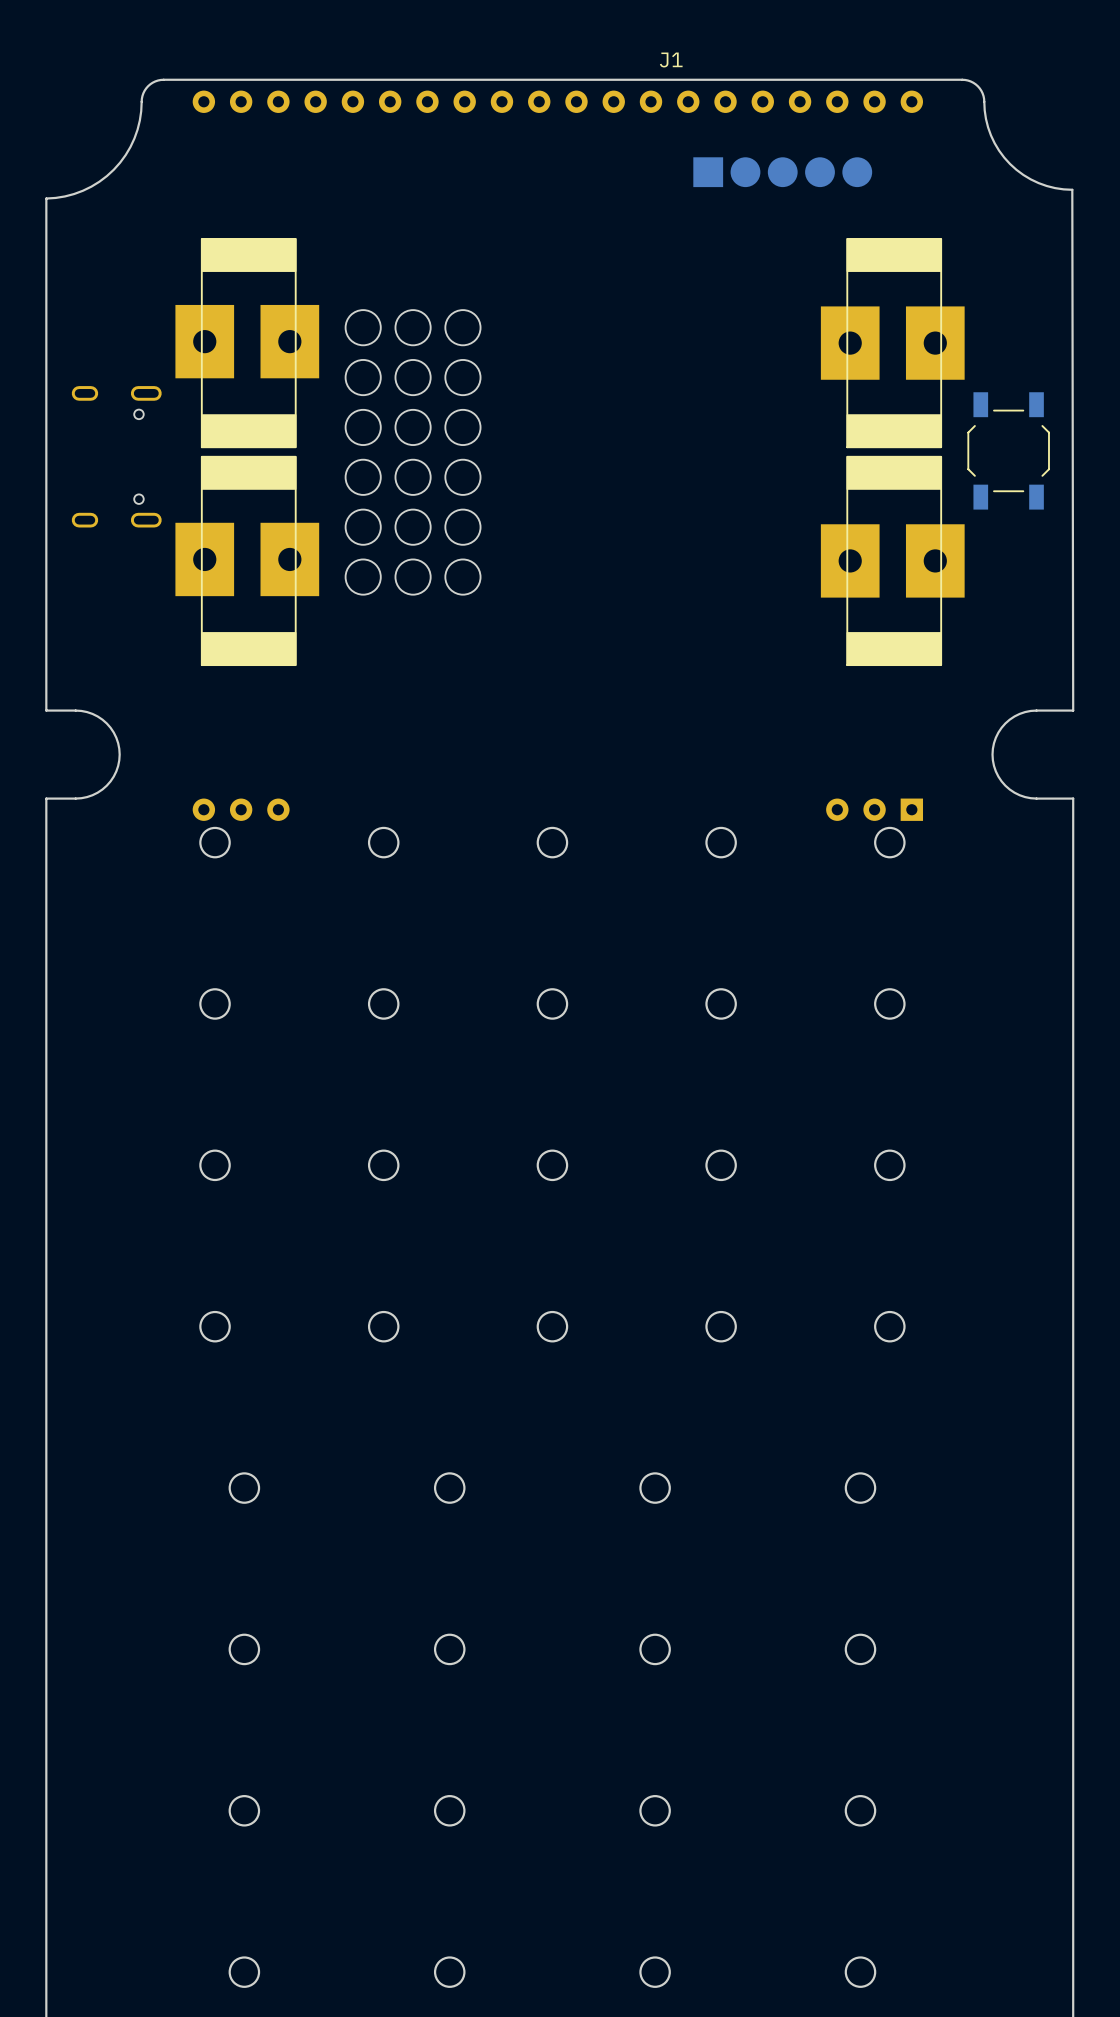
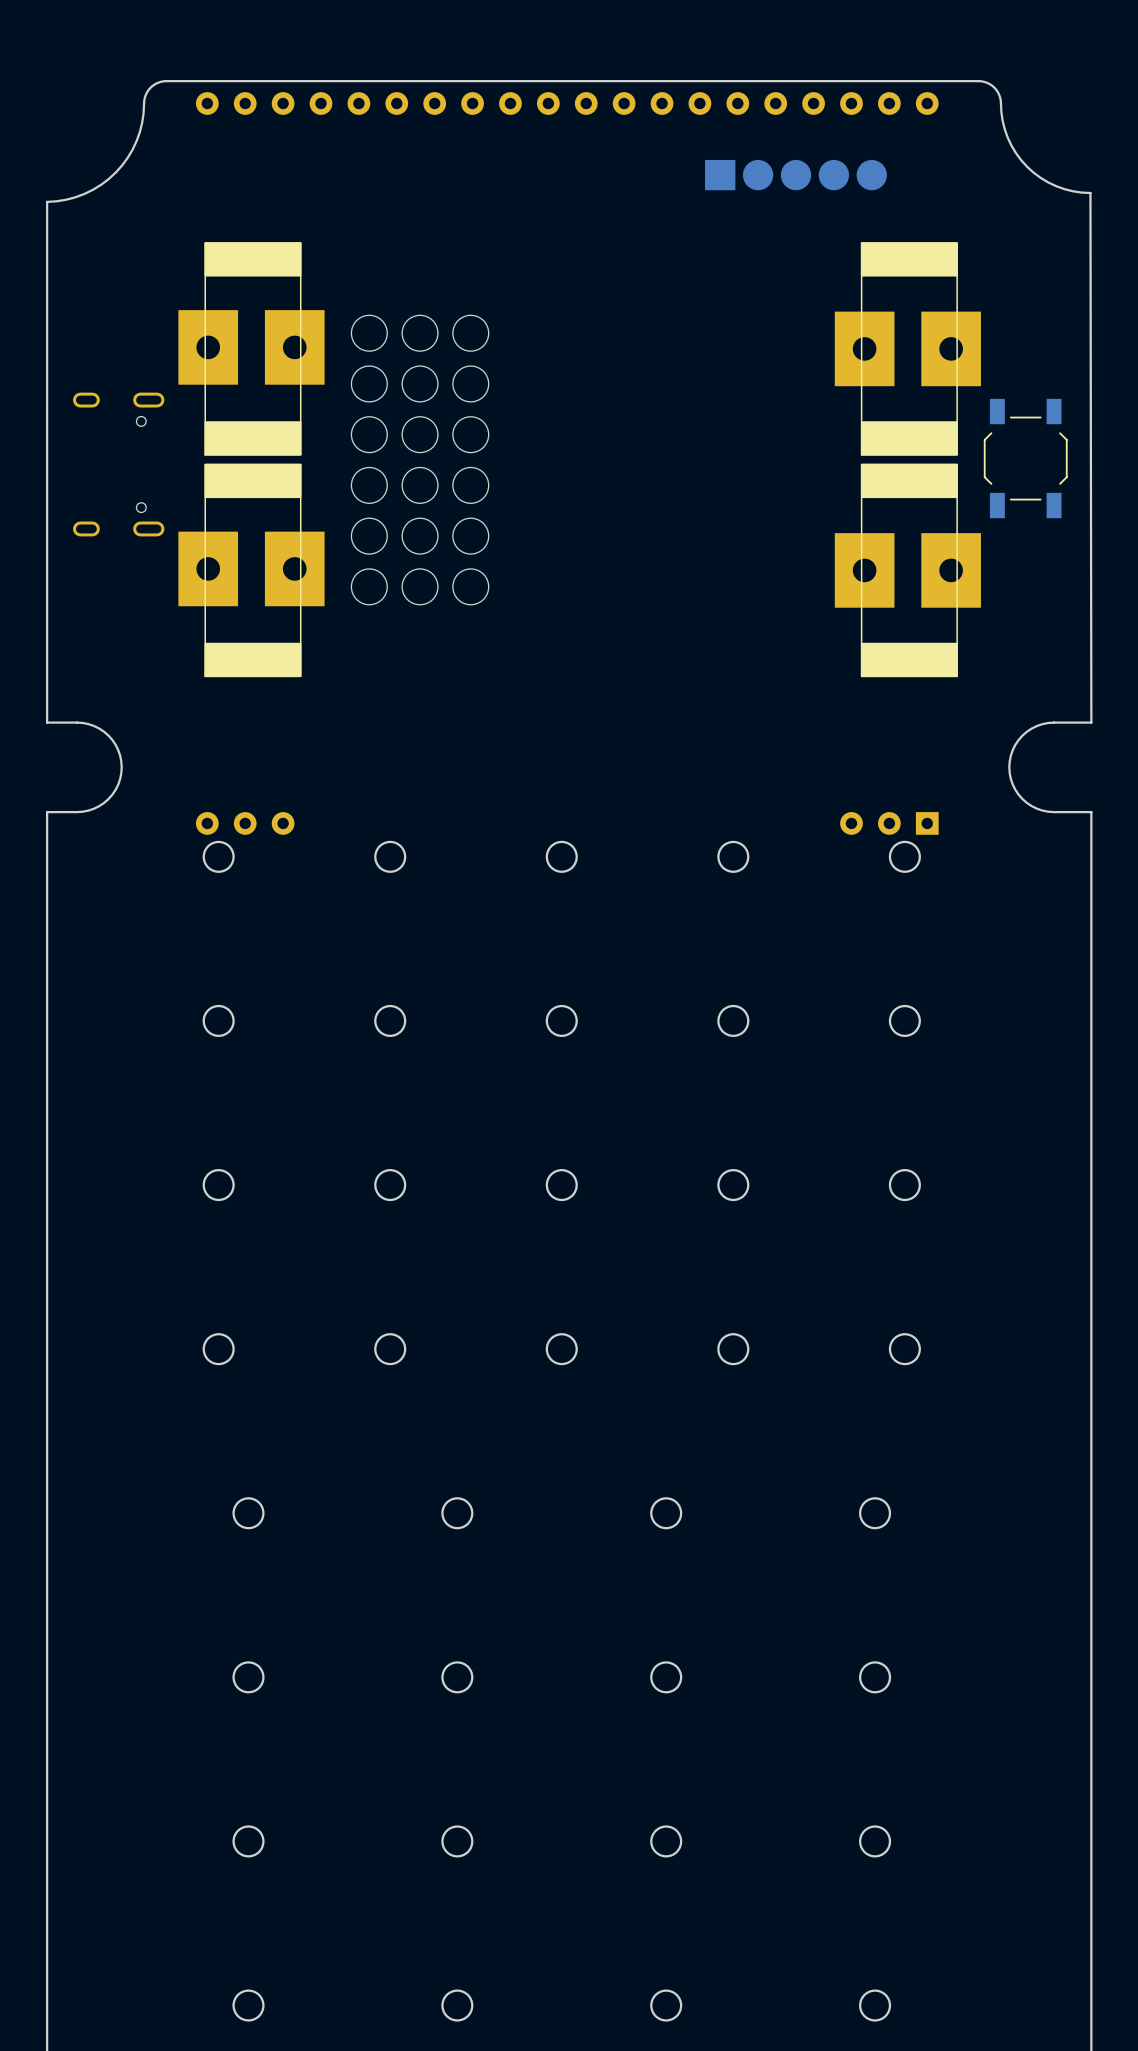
J1 name: J1 (671, 59) -> none

